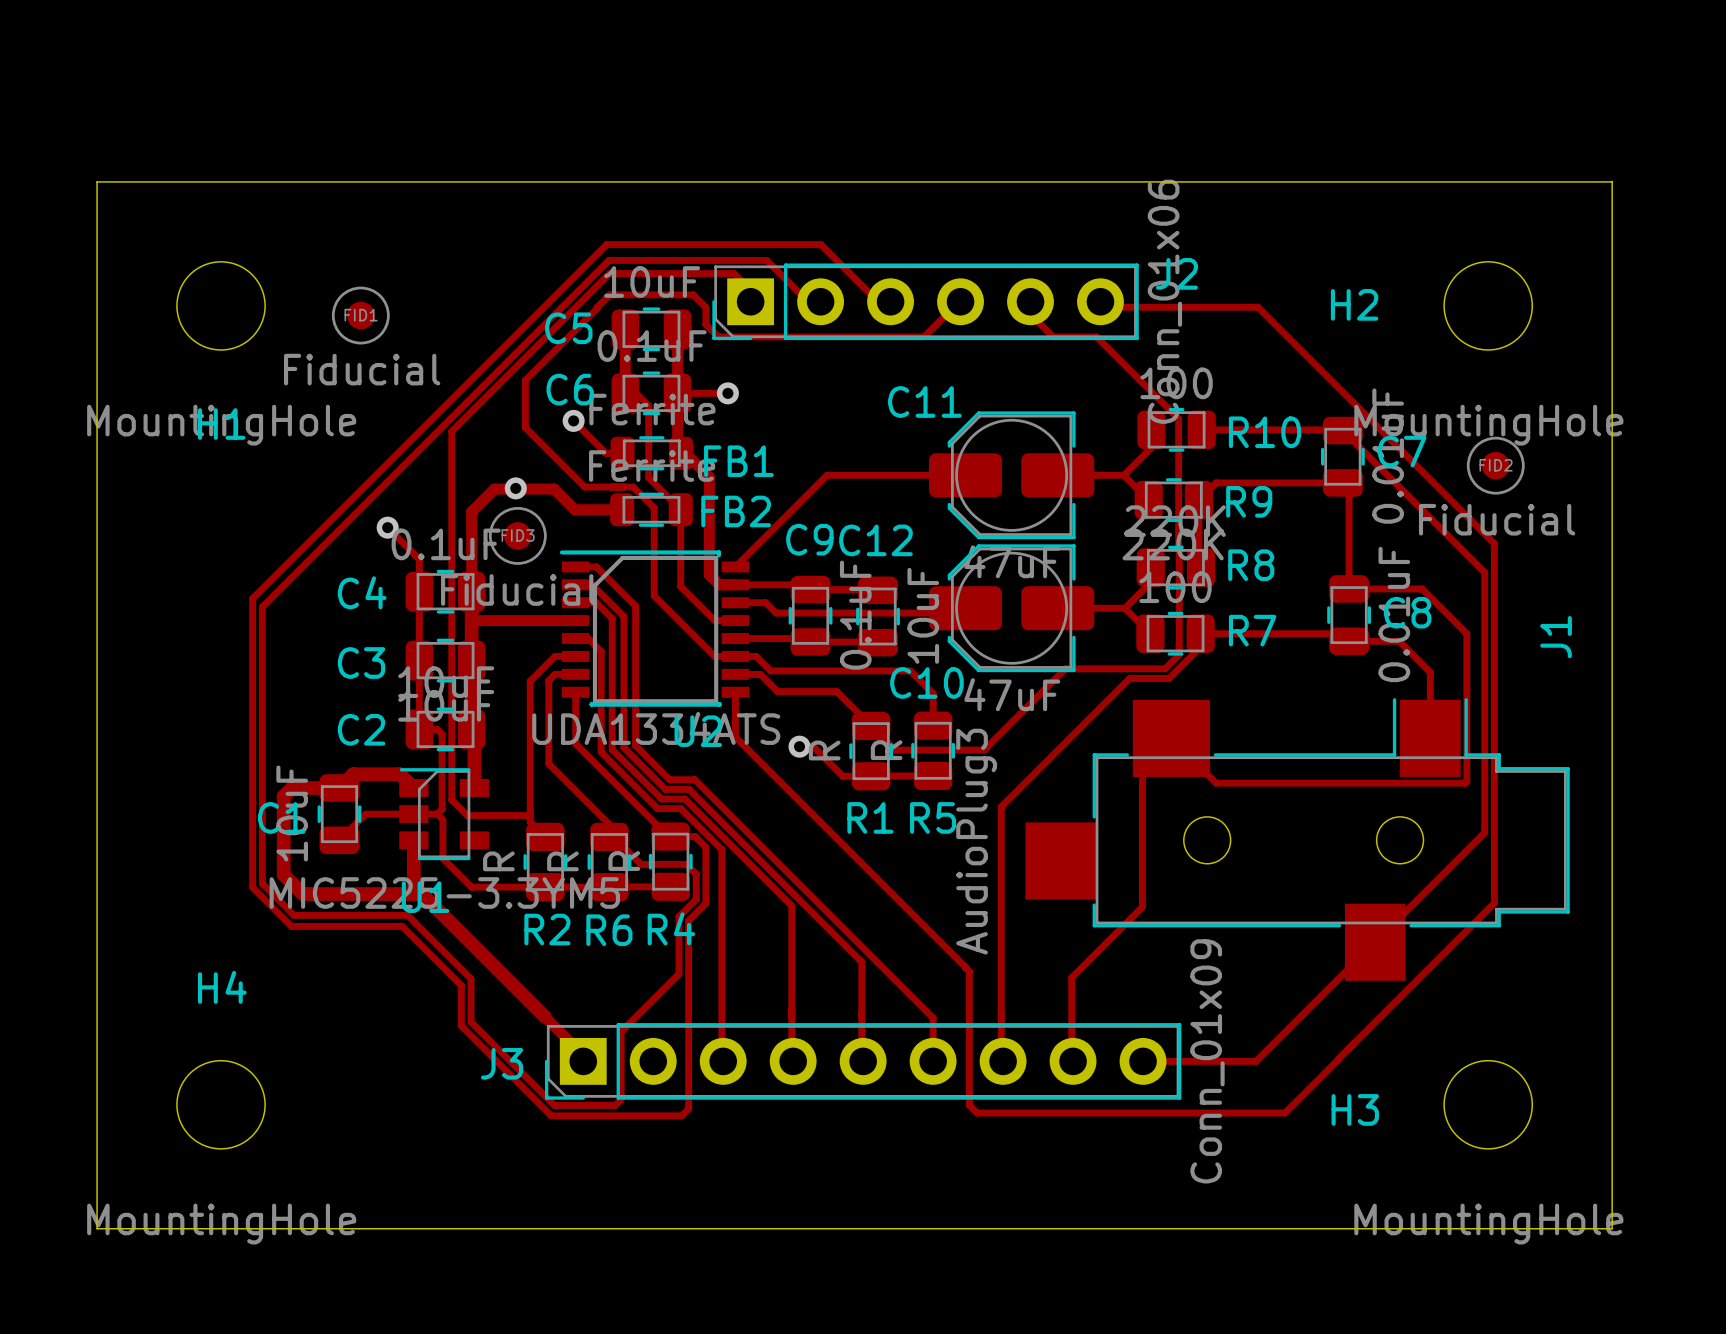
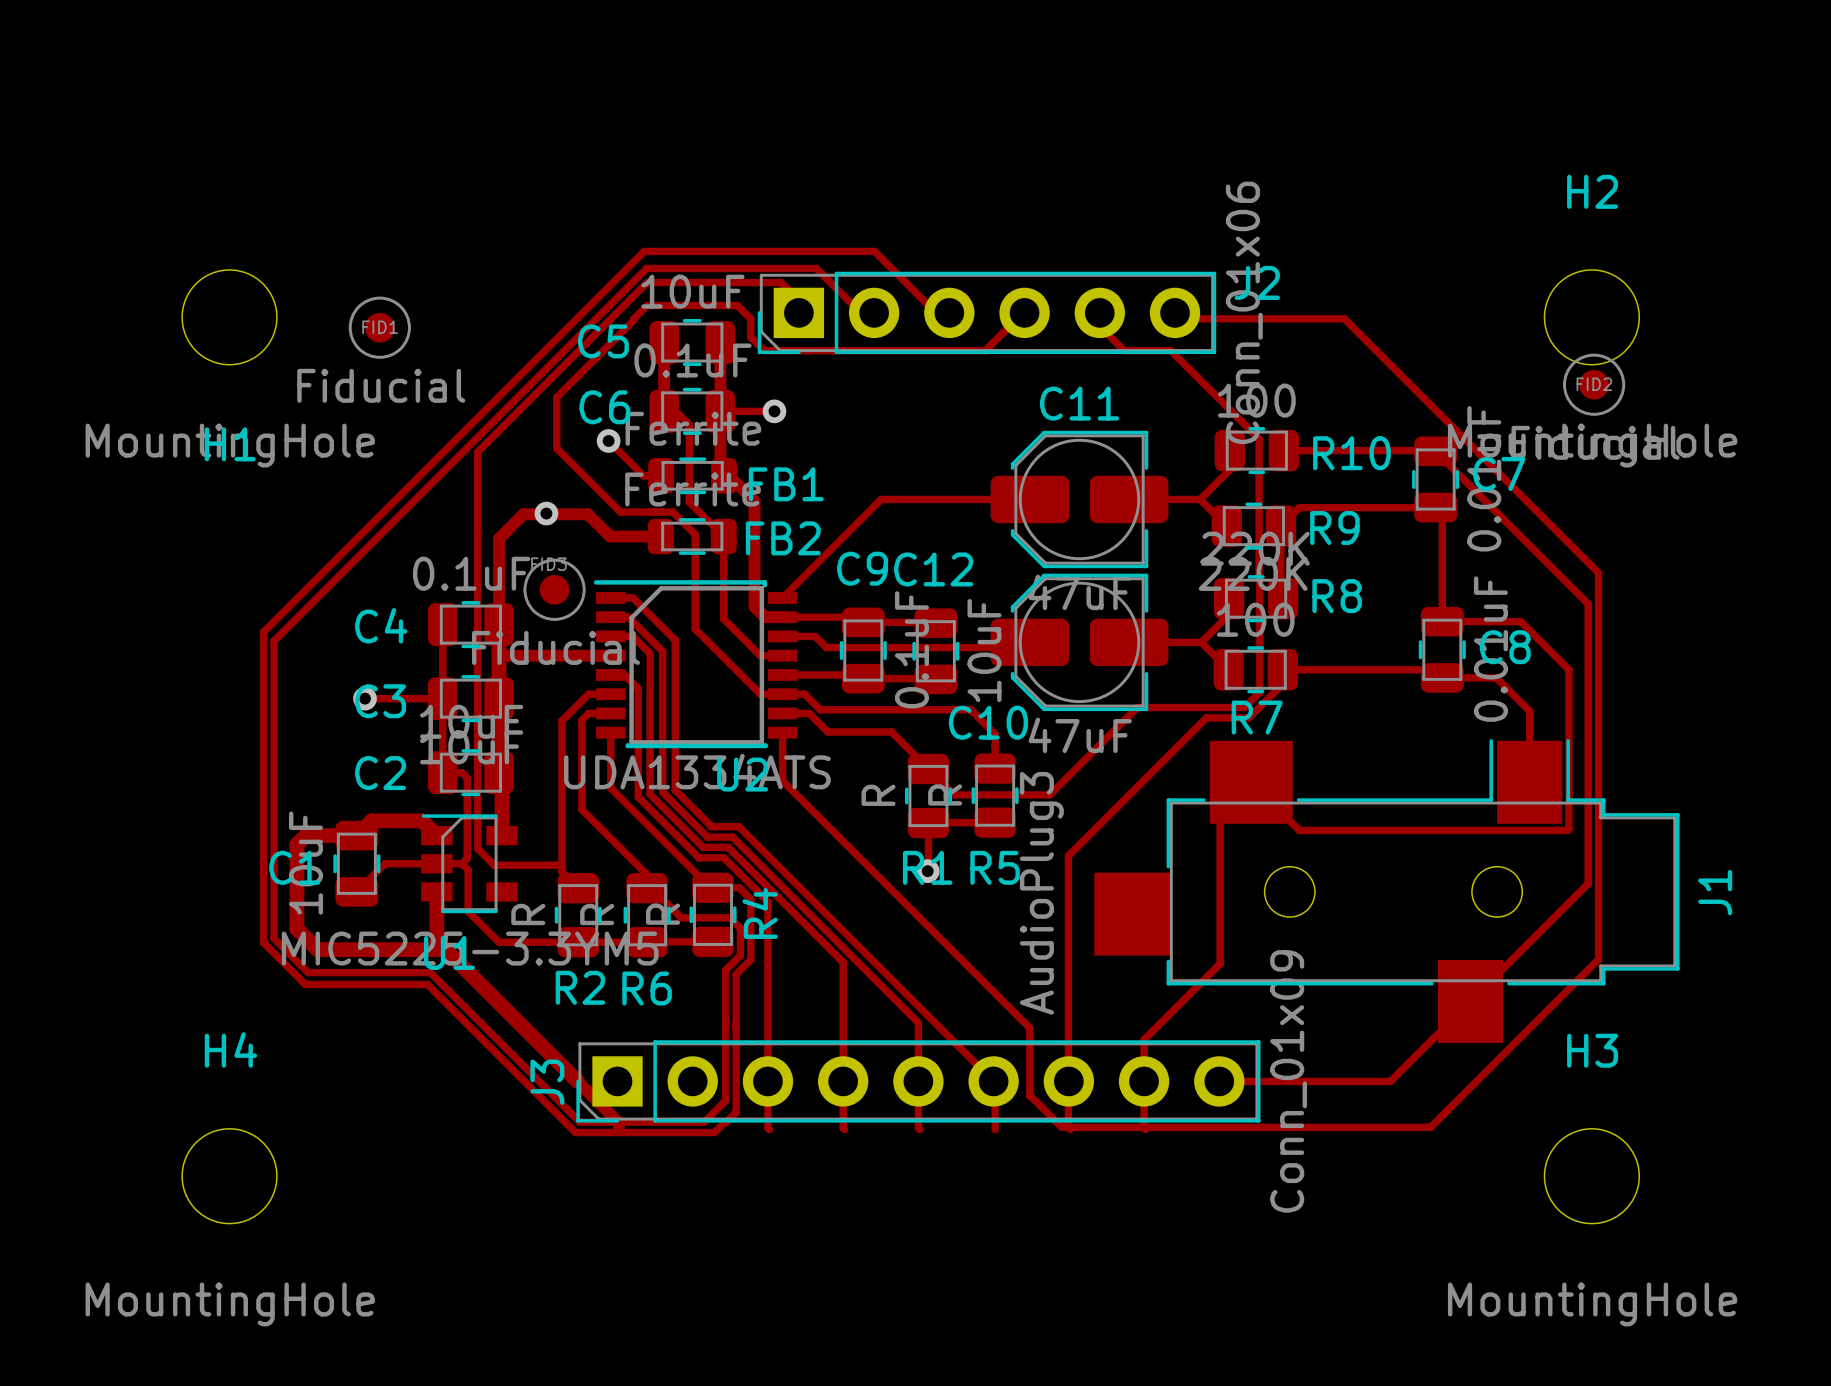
board edge: (97, 181) (97, 1228) (1612, 1228) (1612, 181) (97, 181) -> none
H2 name position: H2 (1354, 304) -> H2 (1592, 191)
C11 name position: C11 (924, 401) -> C11 (1079, 403)
FID2 position: (1495, 465) -> (1594, 384)
track: (387, 527) (419, 559) (419, 591) -> none
via position: (387, 527) -> (365, 698)
FID3 position: (517, 535) -> (554, 589)
R7 name position: R7 (1252, 630) -> R7 (1257, 717)
J1 name position: J1 (1556, 637) -> J1 (1715, 892)
track: none -> (365, 698) (442, 698)
track: (799, 746) (813, 746) (842, 776) (871, 776) -> (927, 871) (928, 823)
via position: (799, 746) -> (927, 871)
track: (682, 913) (678, 916) (678, 973) (621, 1031) (621, 1099) (614, 1105) (554, 1105) (471, 1021) (471, 978) (414, 922) -> (725, 970) (725, 1100) (704, 1122) (579, 1122) (437, 980)
track: (692, 917) (688, 920) (688, 1108) (681, 1115) (551, 1115) (461, 1025) (461, 985) (402, 926) -> (736, 974) (736, 1112) (714, 1132) (575, 1132) (427, 984) (424, 984)
R4 name rotation: 0° (671, 928) -> 90° counterclockwise (760, 913)
R4 name position: R4 (671, 928) -> R4 (760, 913)
track: (965, 967) (969, 971) (969, 1105) (977, 1113) (1285, 1113) (1338, 1059) -> (1029, 1028) (1029, 1096) (1061, 1127) (1430, 1127)
track: (1300, 1016) (1256, 1061) (1143, 1061) -> (1390, 1081) (1219, 1081)
J3 position: (863, 1061) -> (918, 1081)
J3 name rotation: 0° (502, 1063) -> 90° counterclockwise (547, 1082)
H3 name position: H3 (1355, 1109) -> H3 (1592, 1050)

